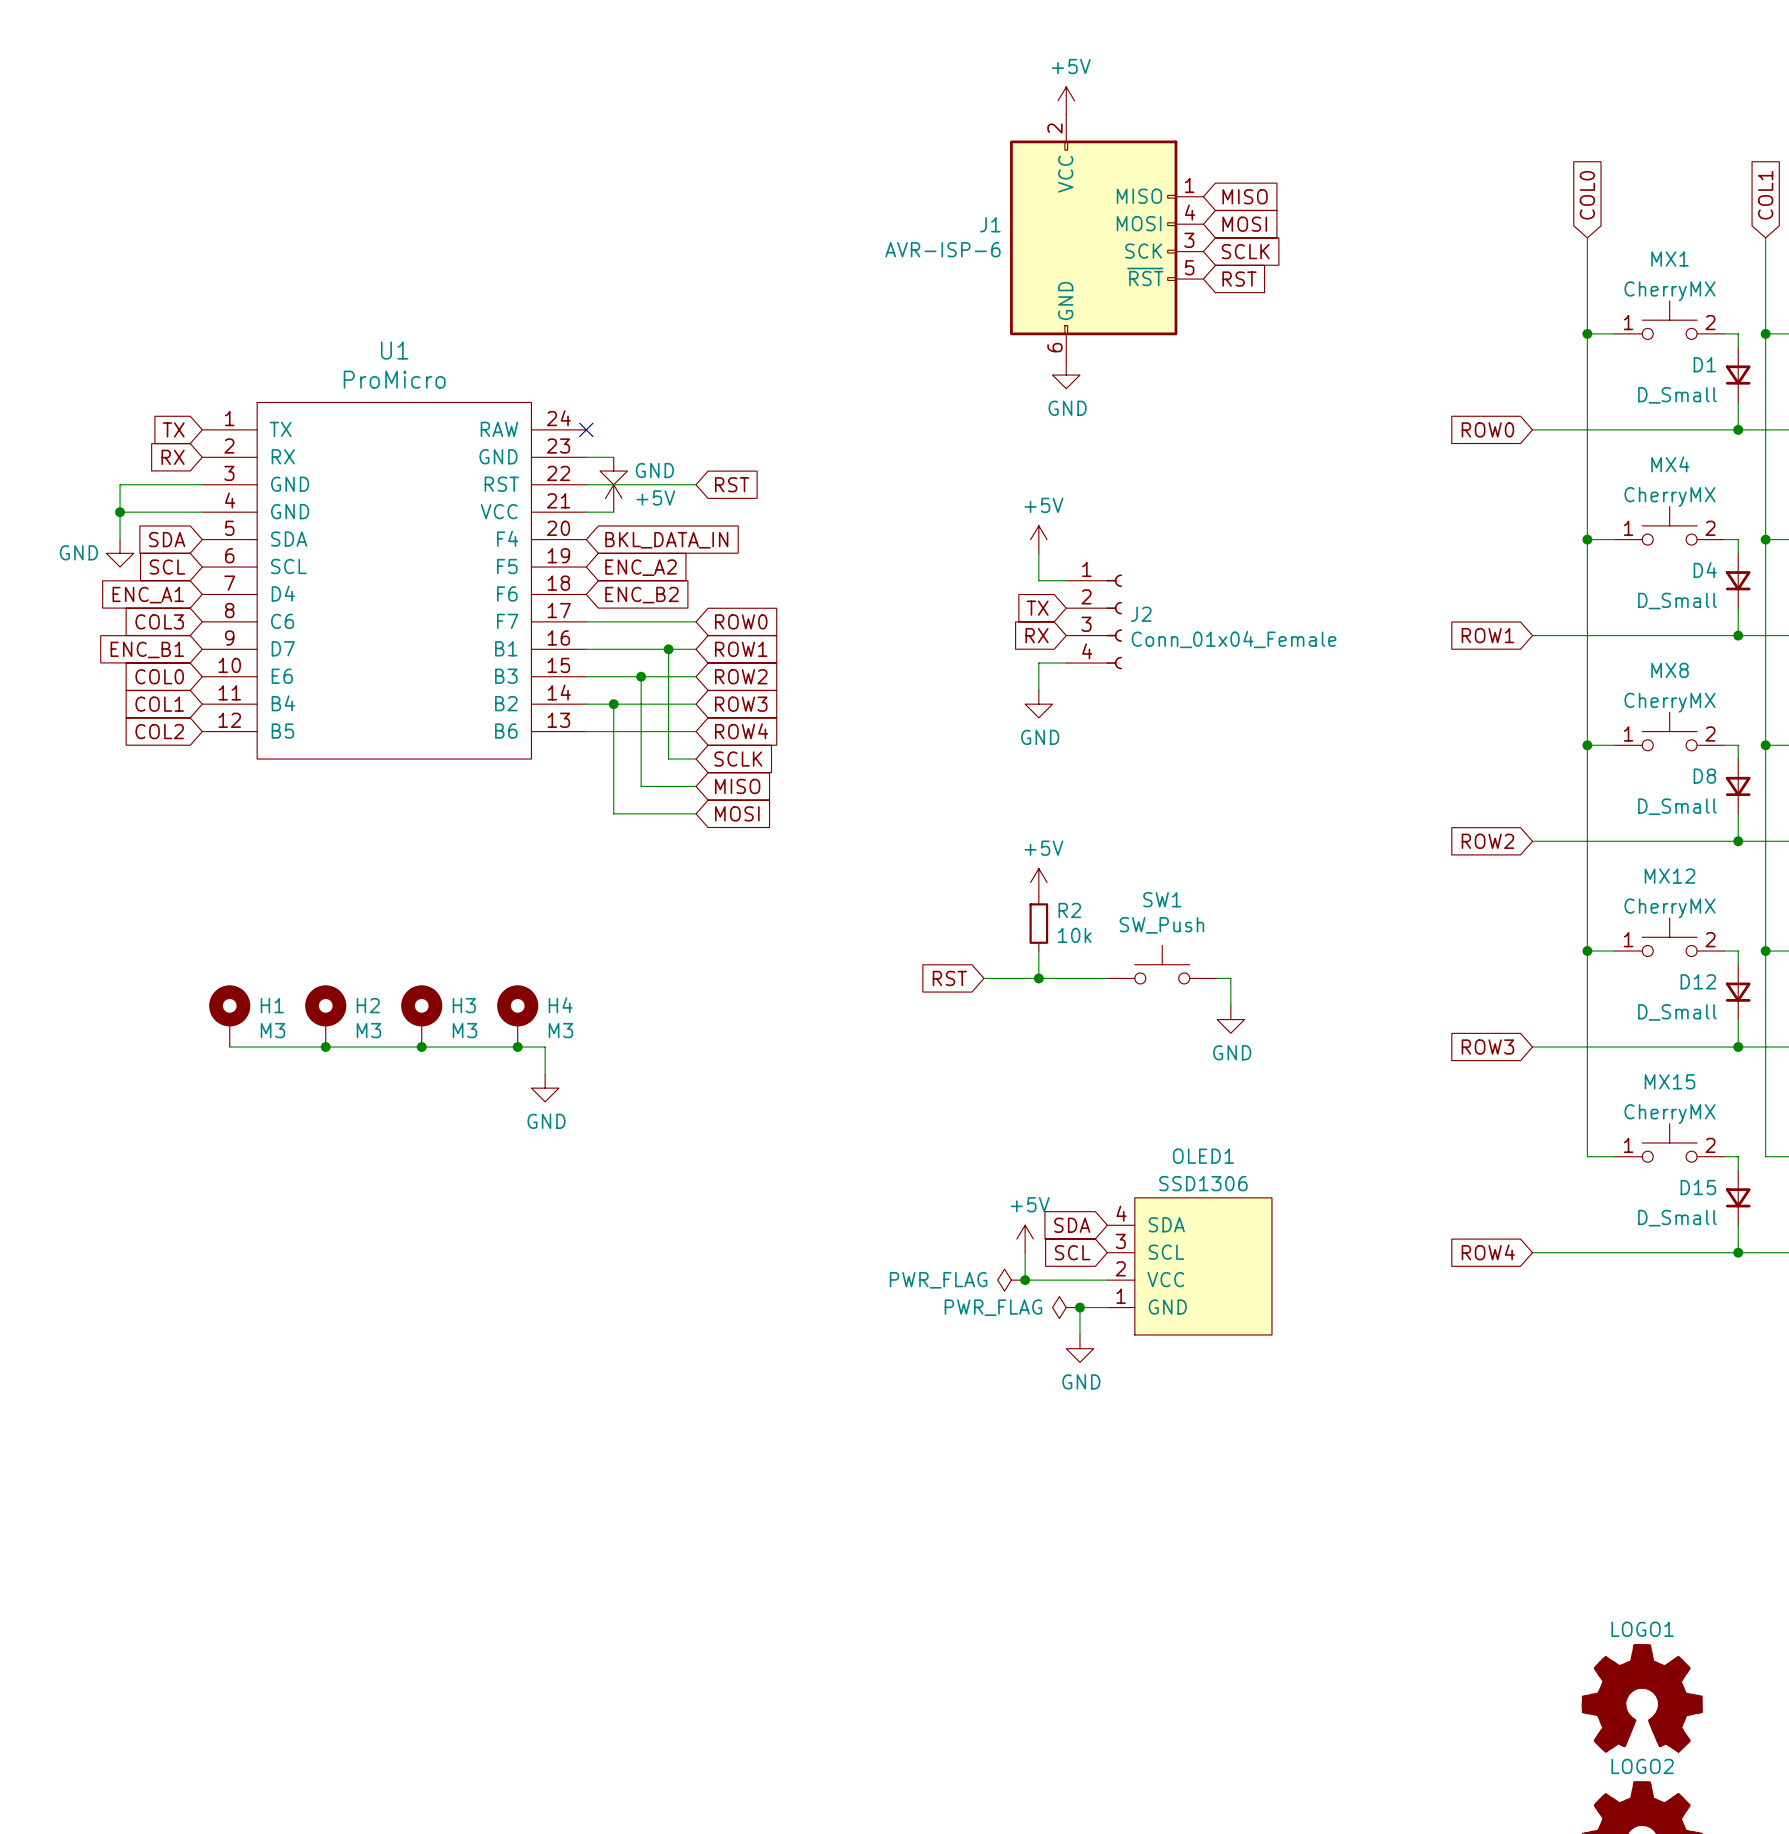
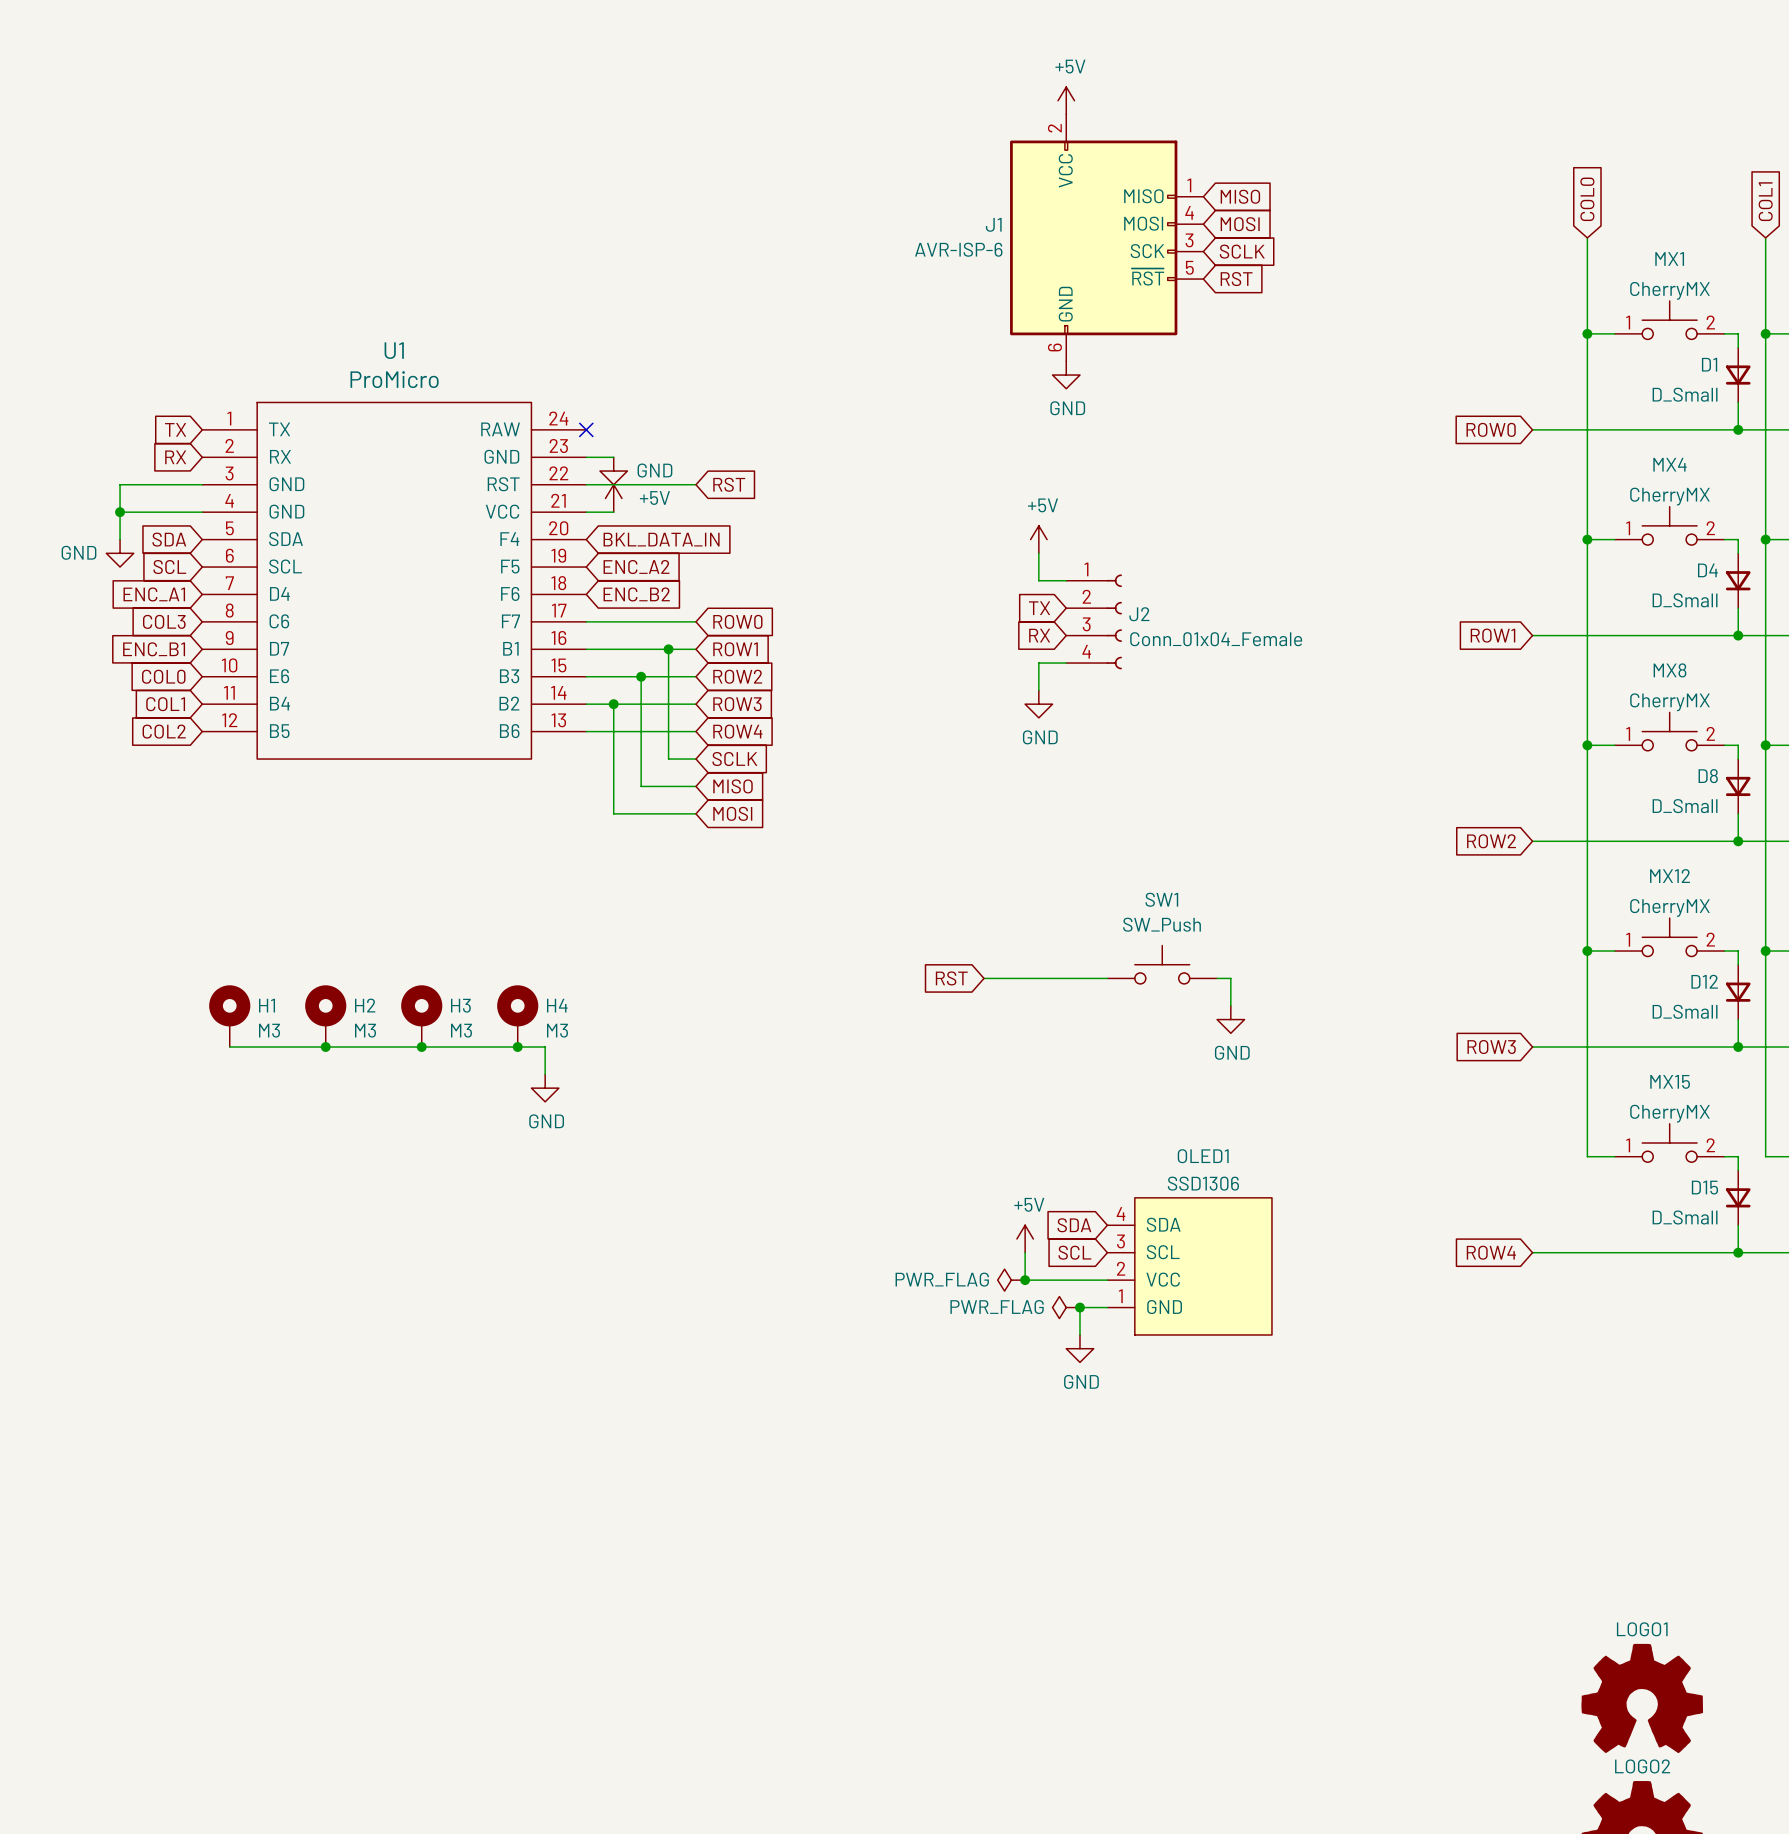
power symbol: +5V (1038, 882) -> none
R2: 10k (1038, 923) -> none
wire: (1038, 951) (1038, 978) -> none
junction: (1038, 978) -> none

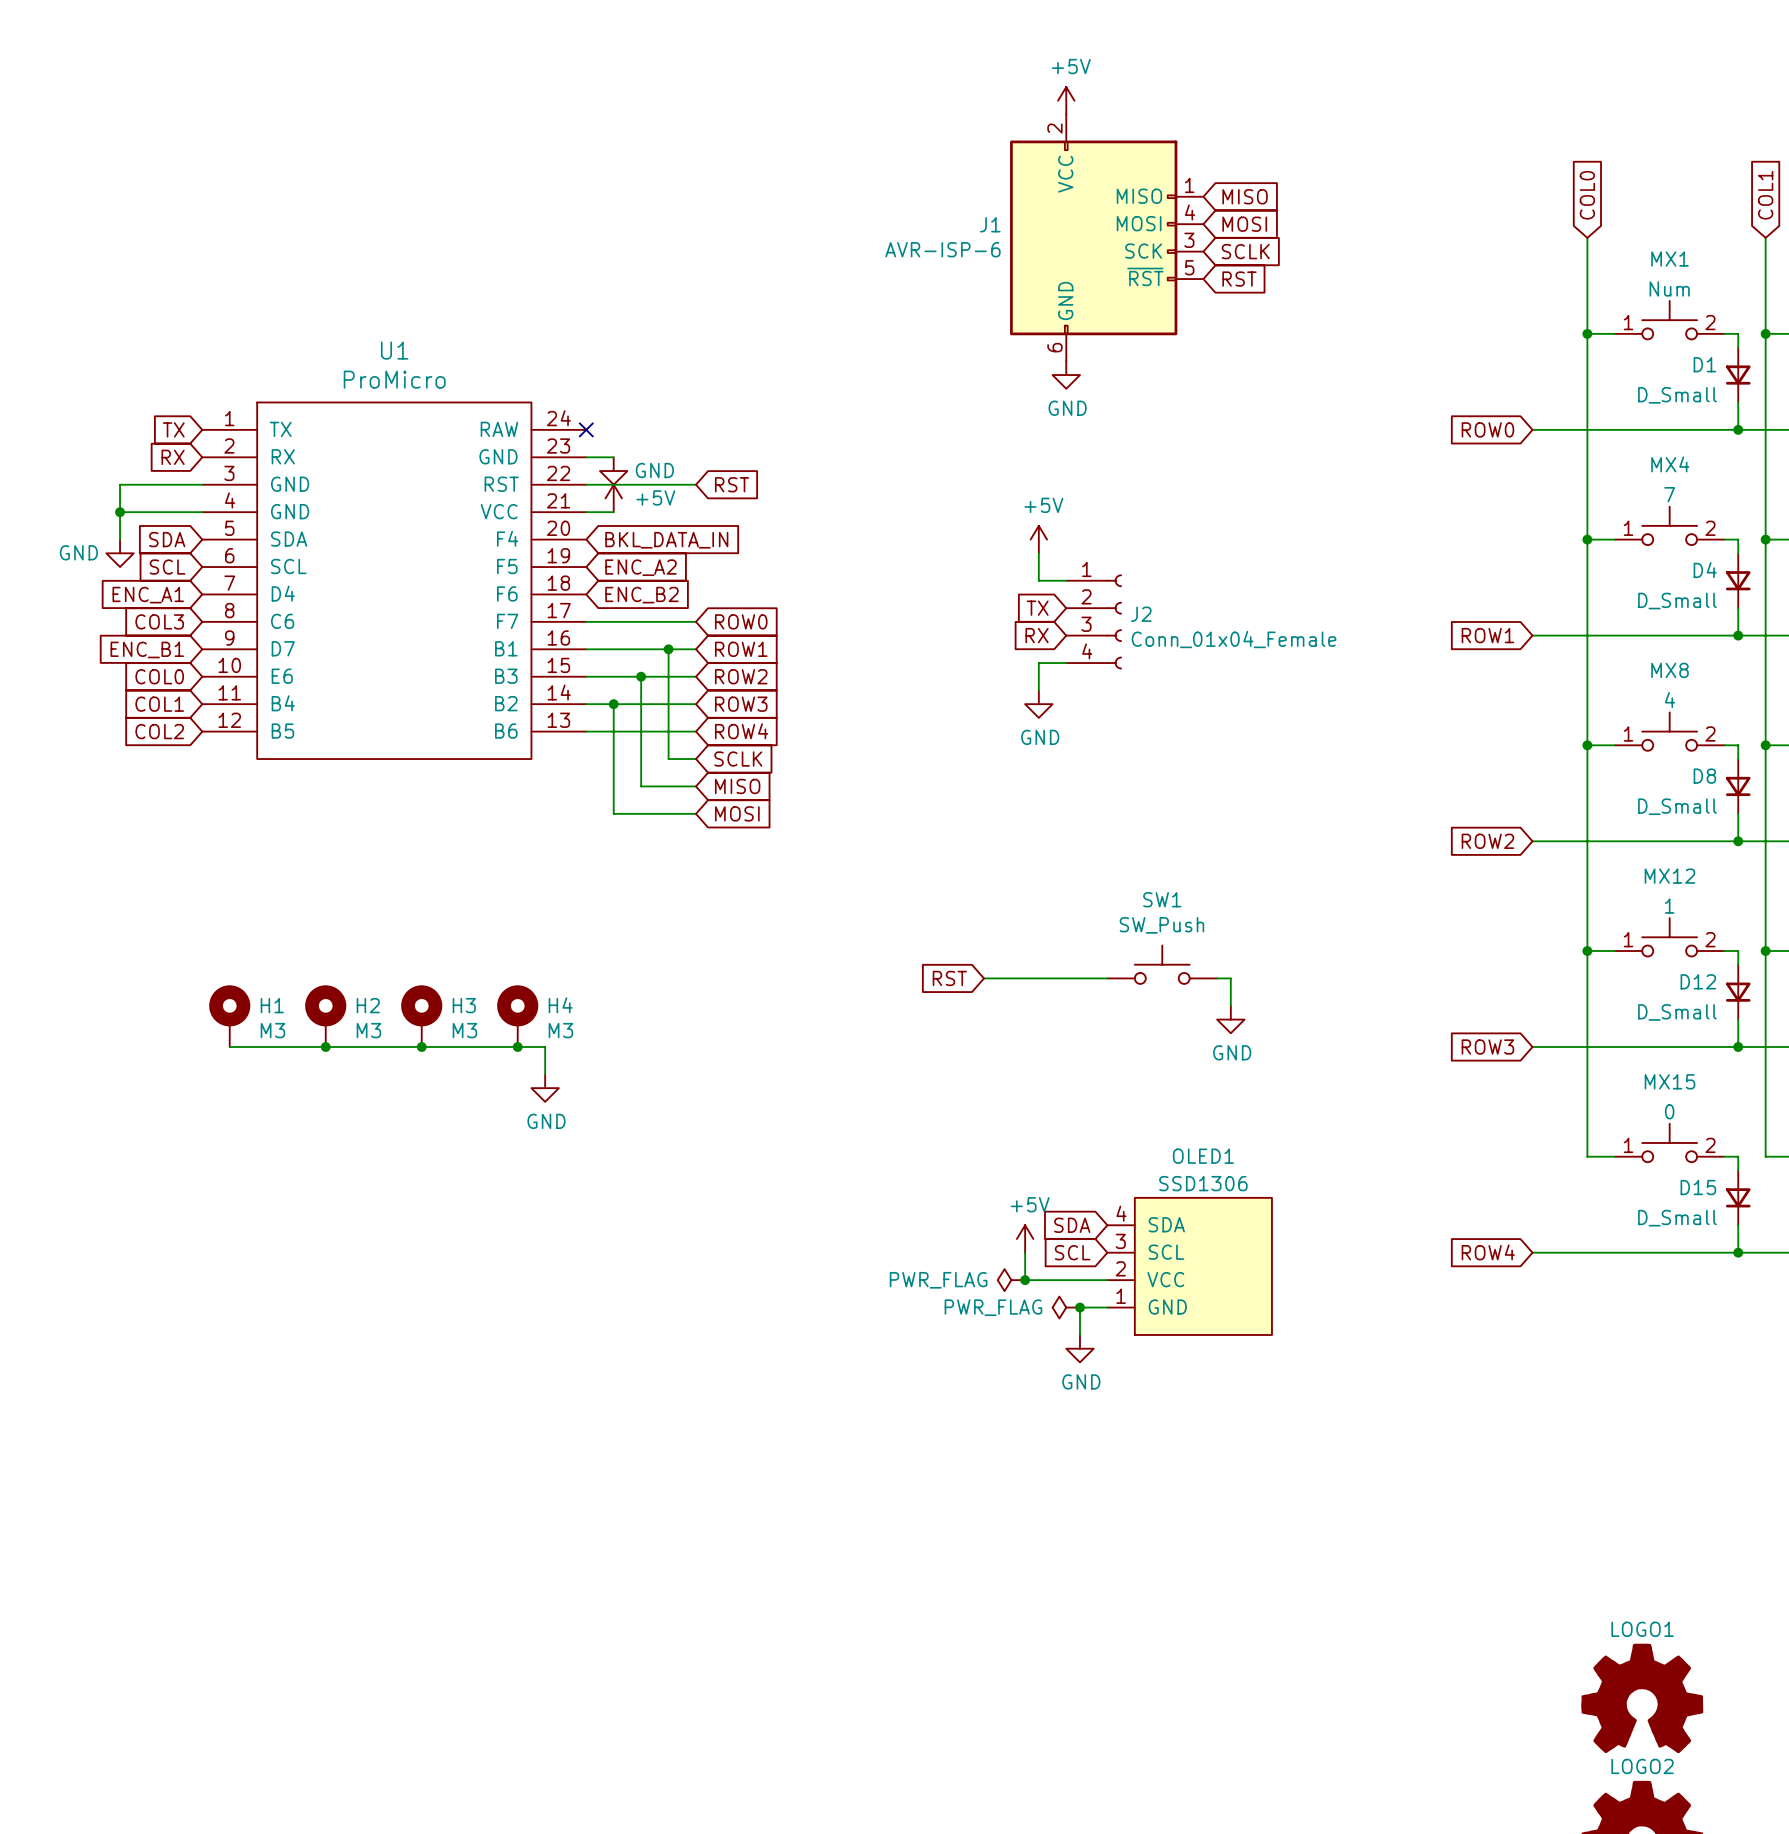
MX1 value: CherryMX (1670, 290) -> Num (1669, 288)
MX4 value: CherryMX (1670, 496) -> 7 (1669, 494)
MX8 value: CherryMX (1670, 702) -> 4 (1669, 700)
MX12 value: CherryMX (1670, 907) -> 1 (1669, 906)
MX15 value: CherryMX (1670, 1113) -> 0 (1669, 1111)

